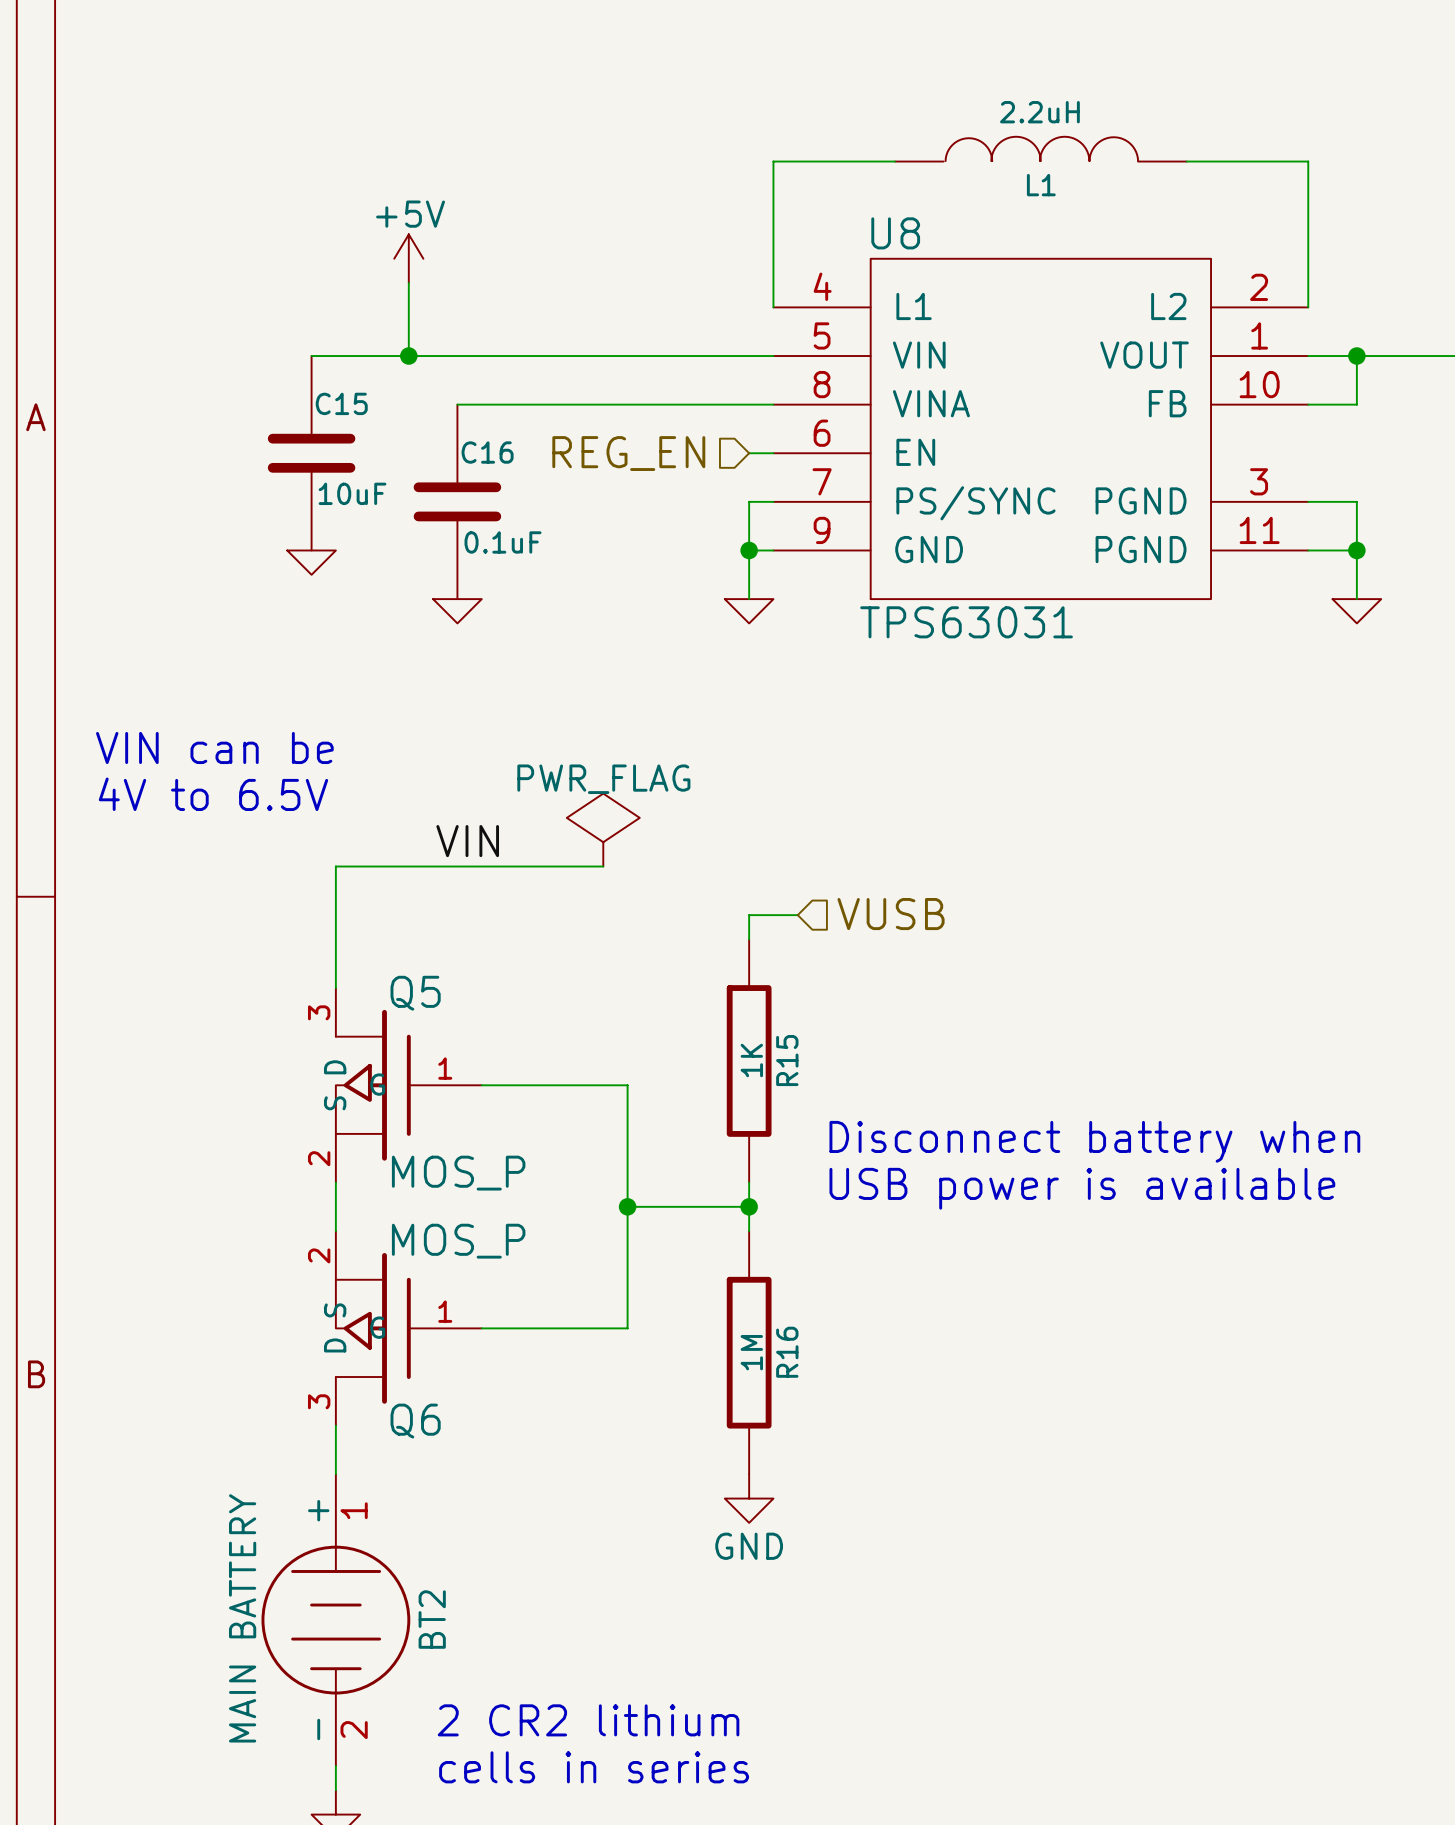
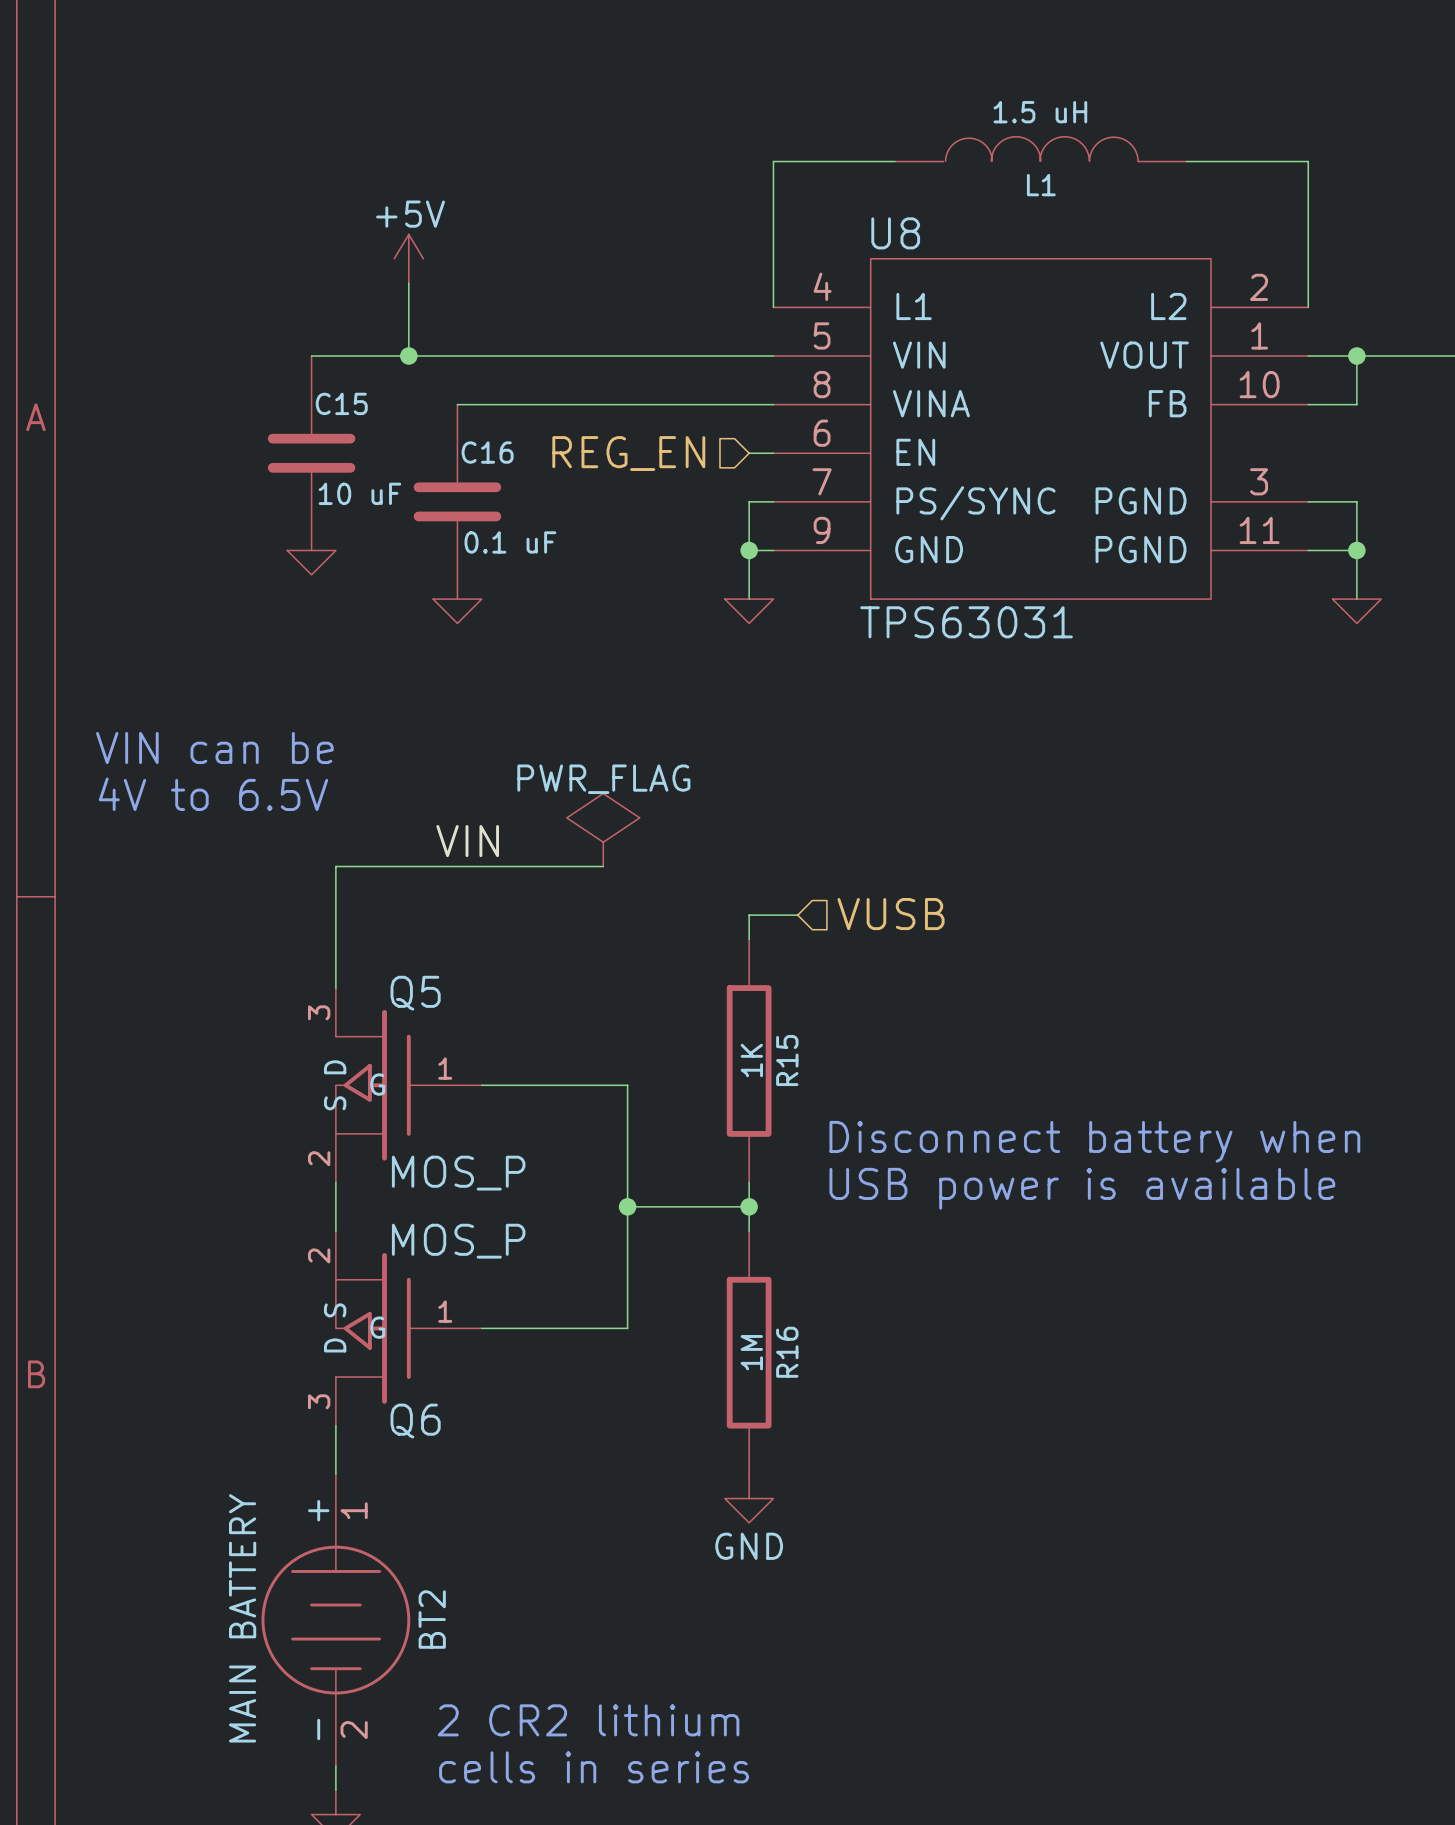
L1 value: 2.2uH (1039, 112) -> 1.5 uH (1040, 112)
C15 value: 10uF (352, 493) -> 10 uF (359, 493)
C16 value: 0.1uF (503, 542) -> 0.1 uF (510, 542)

